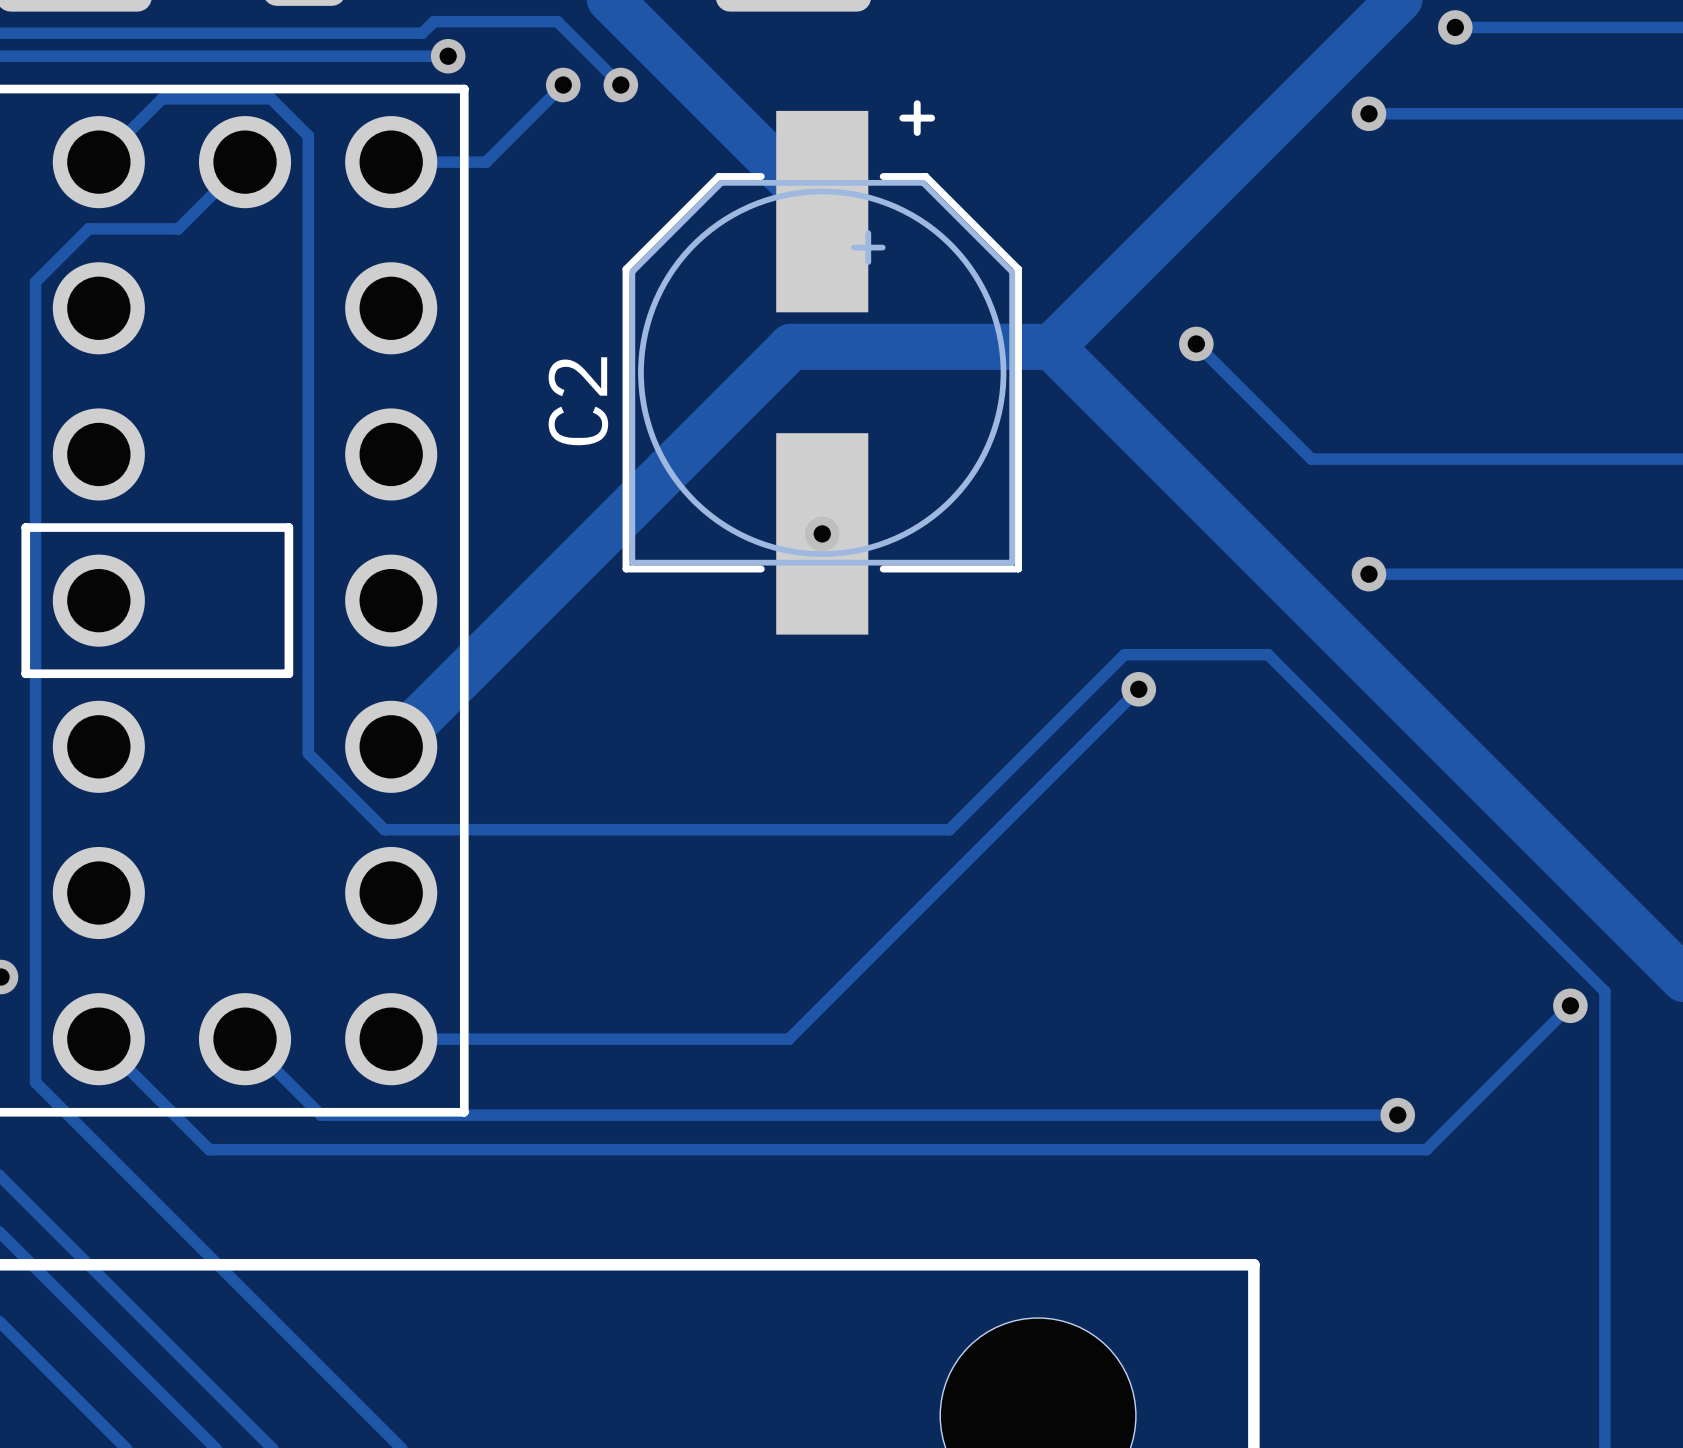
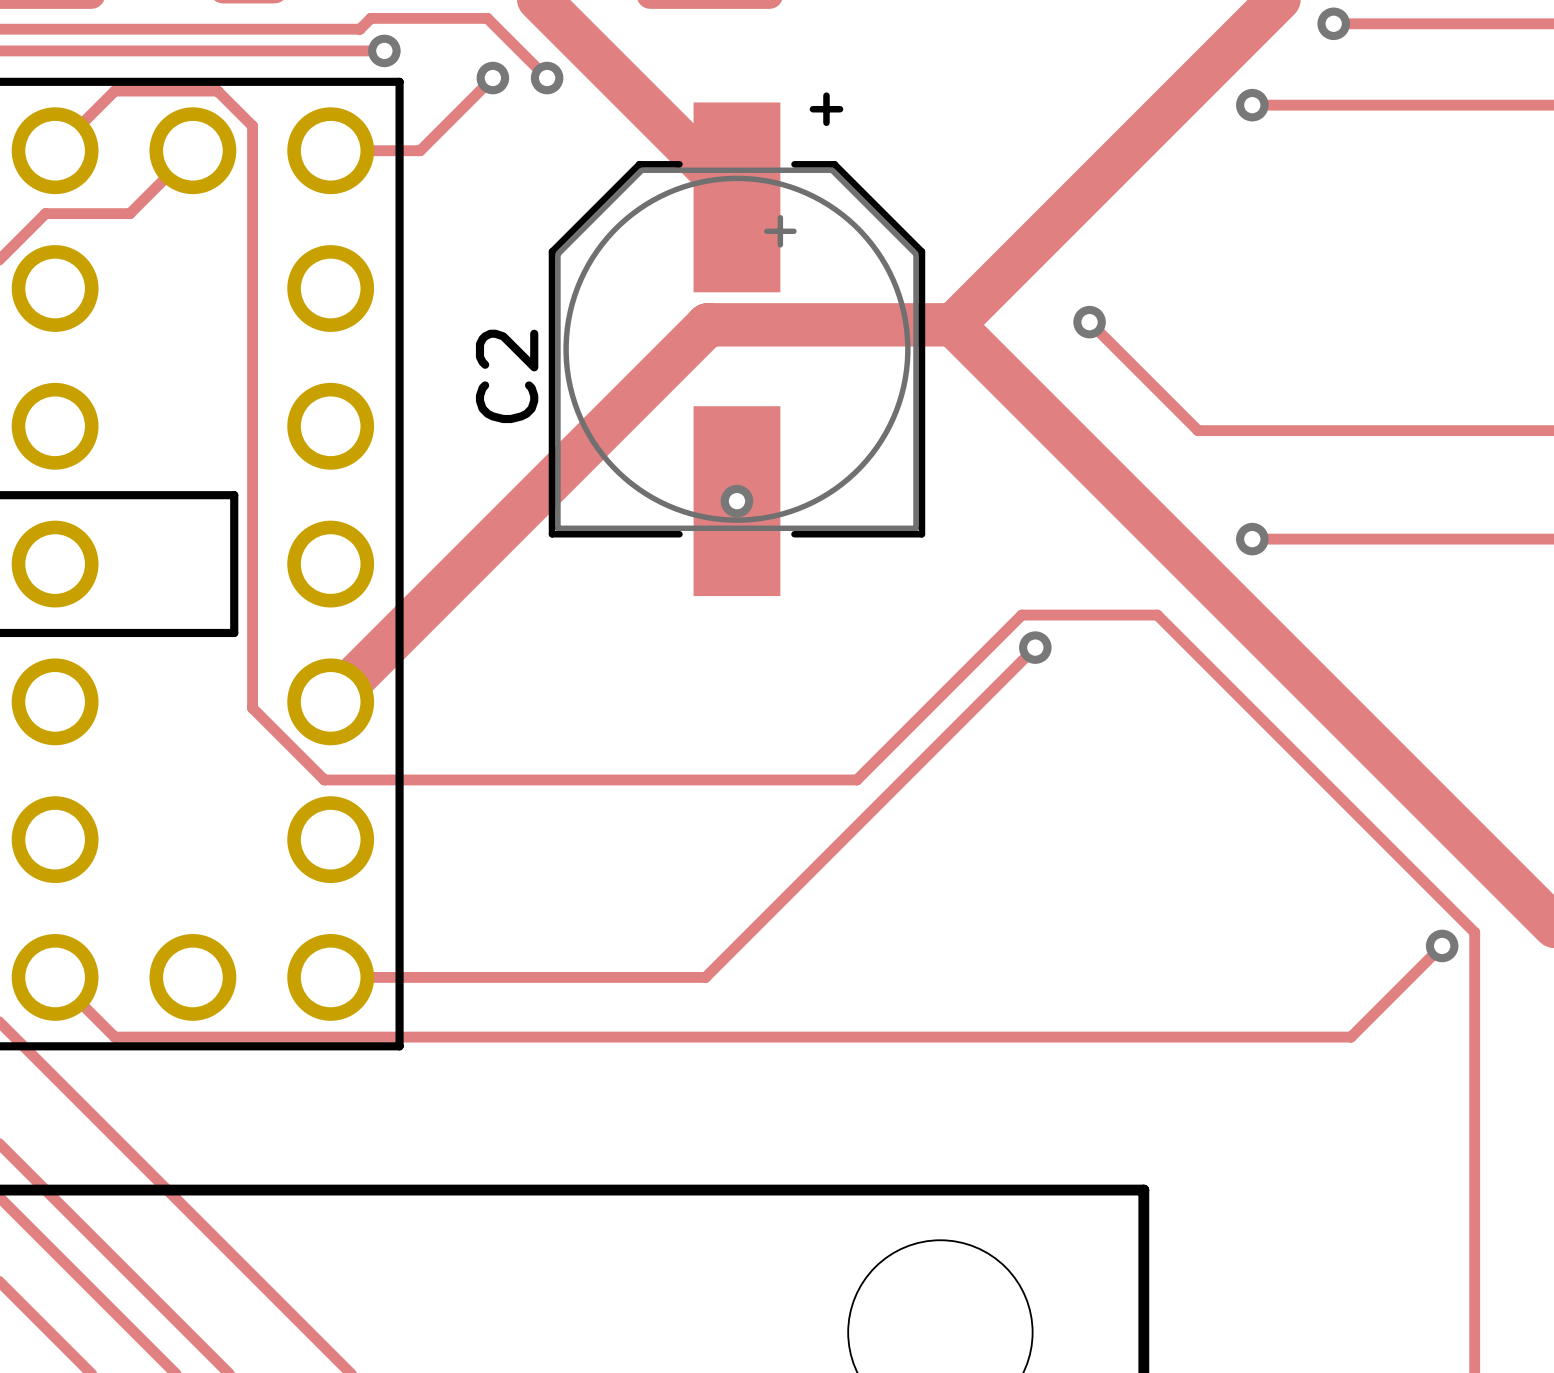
track: (245, 1039) (320, 1115) (1397, 1115) -> none
track: (162, 1102) (209, 1149) (1426, 1149) (1473, 1102) -> (114, 1037) (1351, 1037)
via: (1397, 1115) -> none

